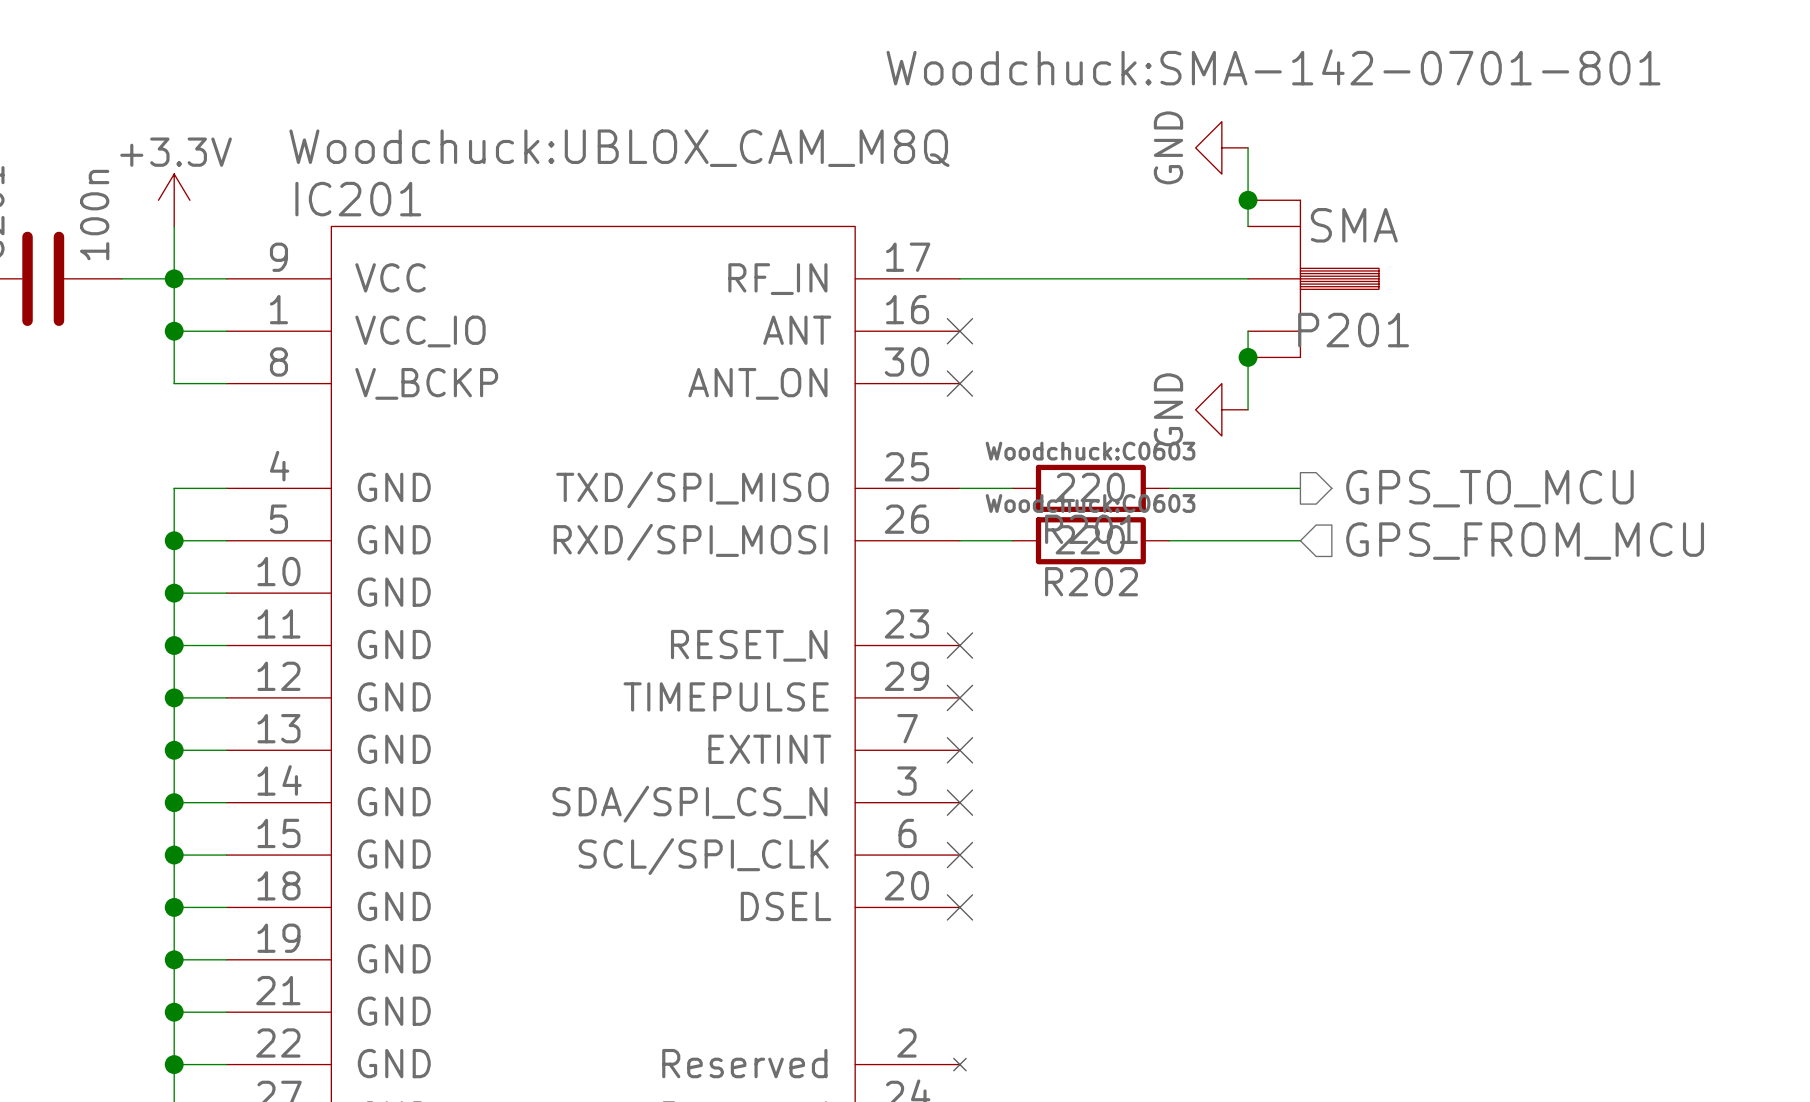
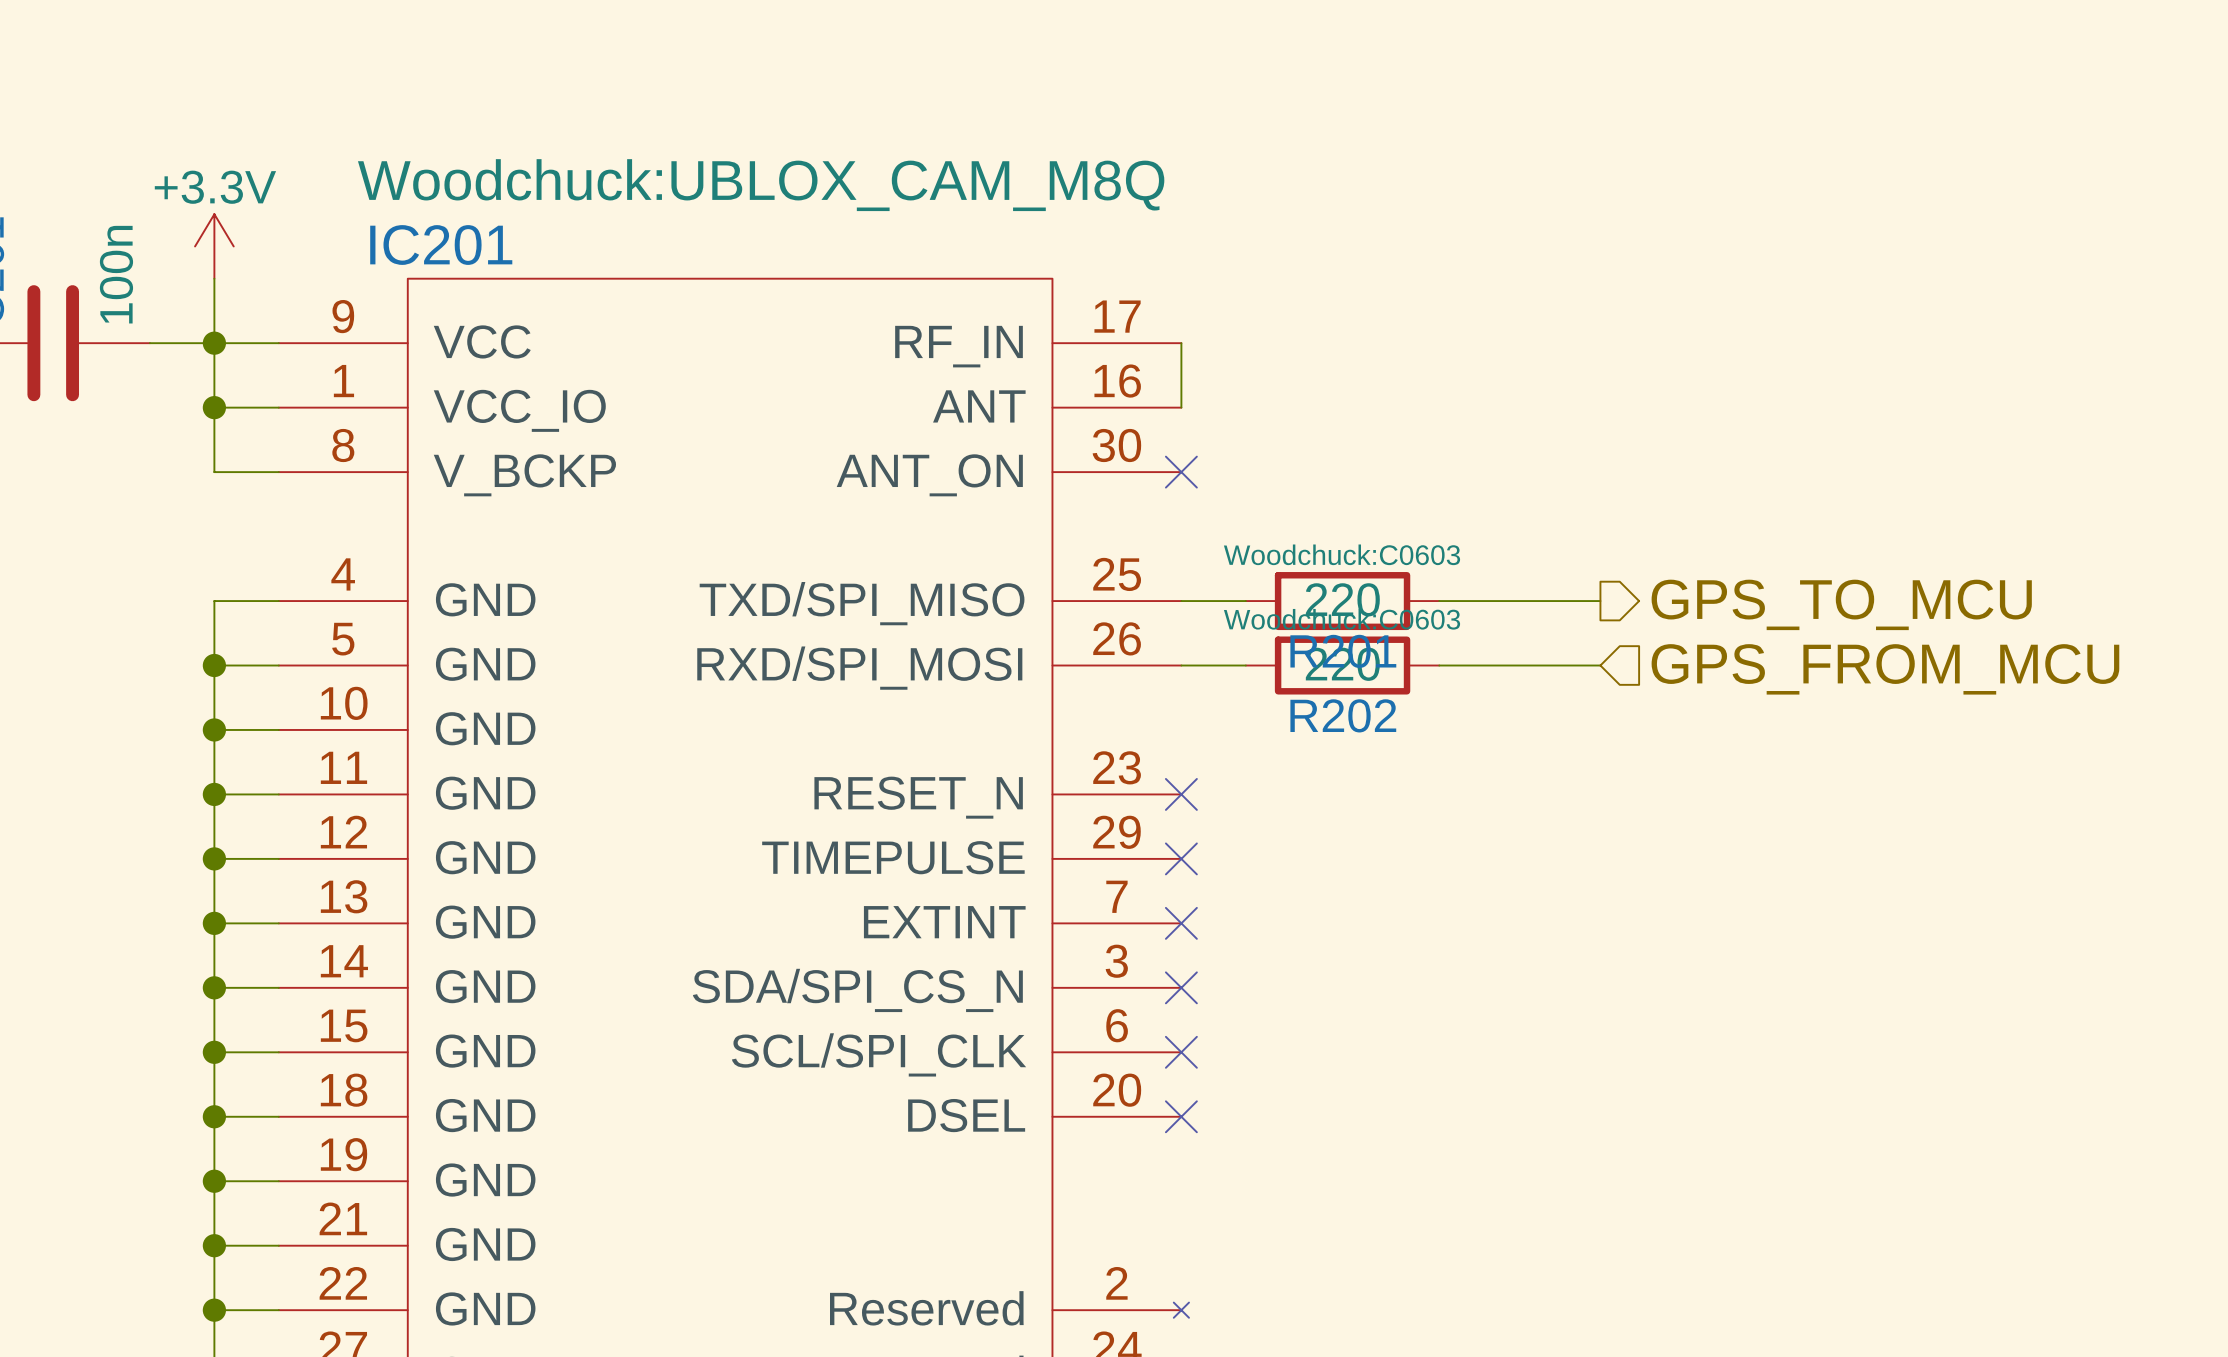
power symbol: GND (1221, 147) -> none
wire: (1248, 147) (1248, 226) -> none
junction: (1248, 200) -> none
wire: (959, 278) (1248, 278) -> (1181, 343) (1181, 407)
P201: SMA (1313, 278) -> none
no-connect mark: (959, 331) -> none
wire: (1248, 331) (1248, 409) -> none
junction: (1248, 357) -> none
power symbol: GND (1221, 409) -> none

